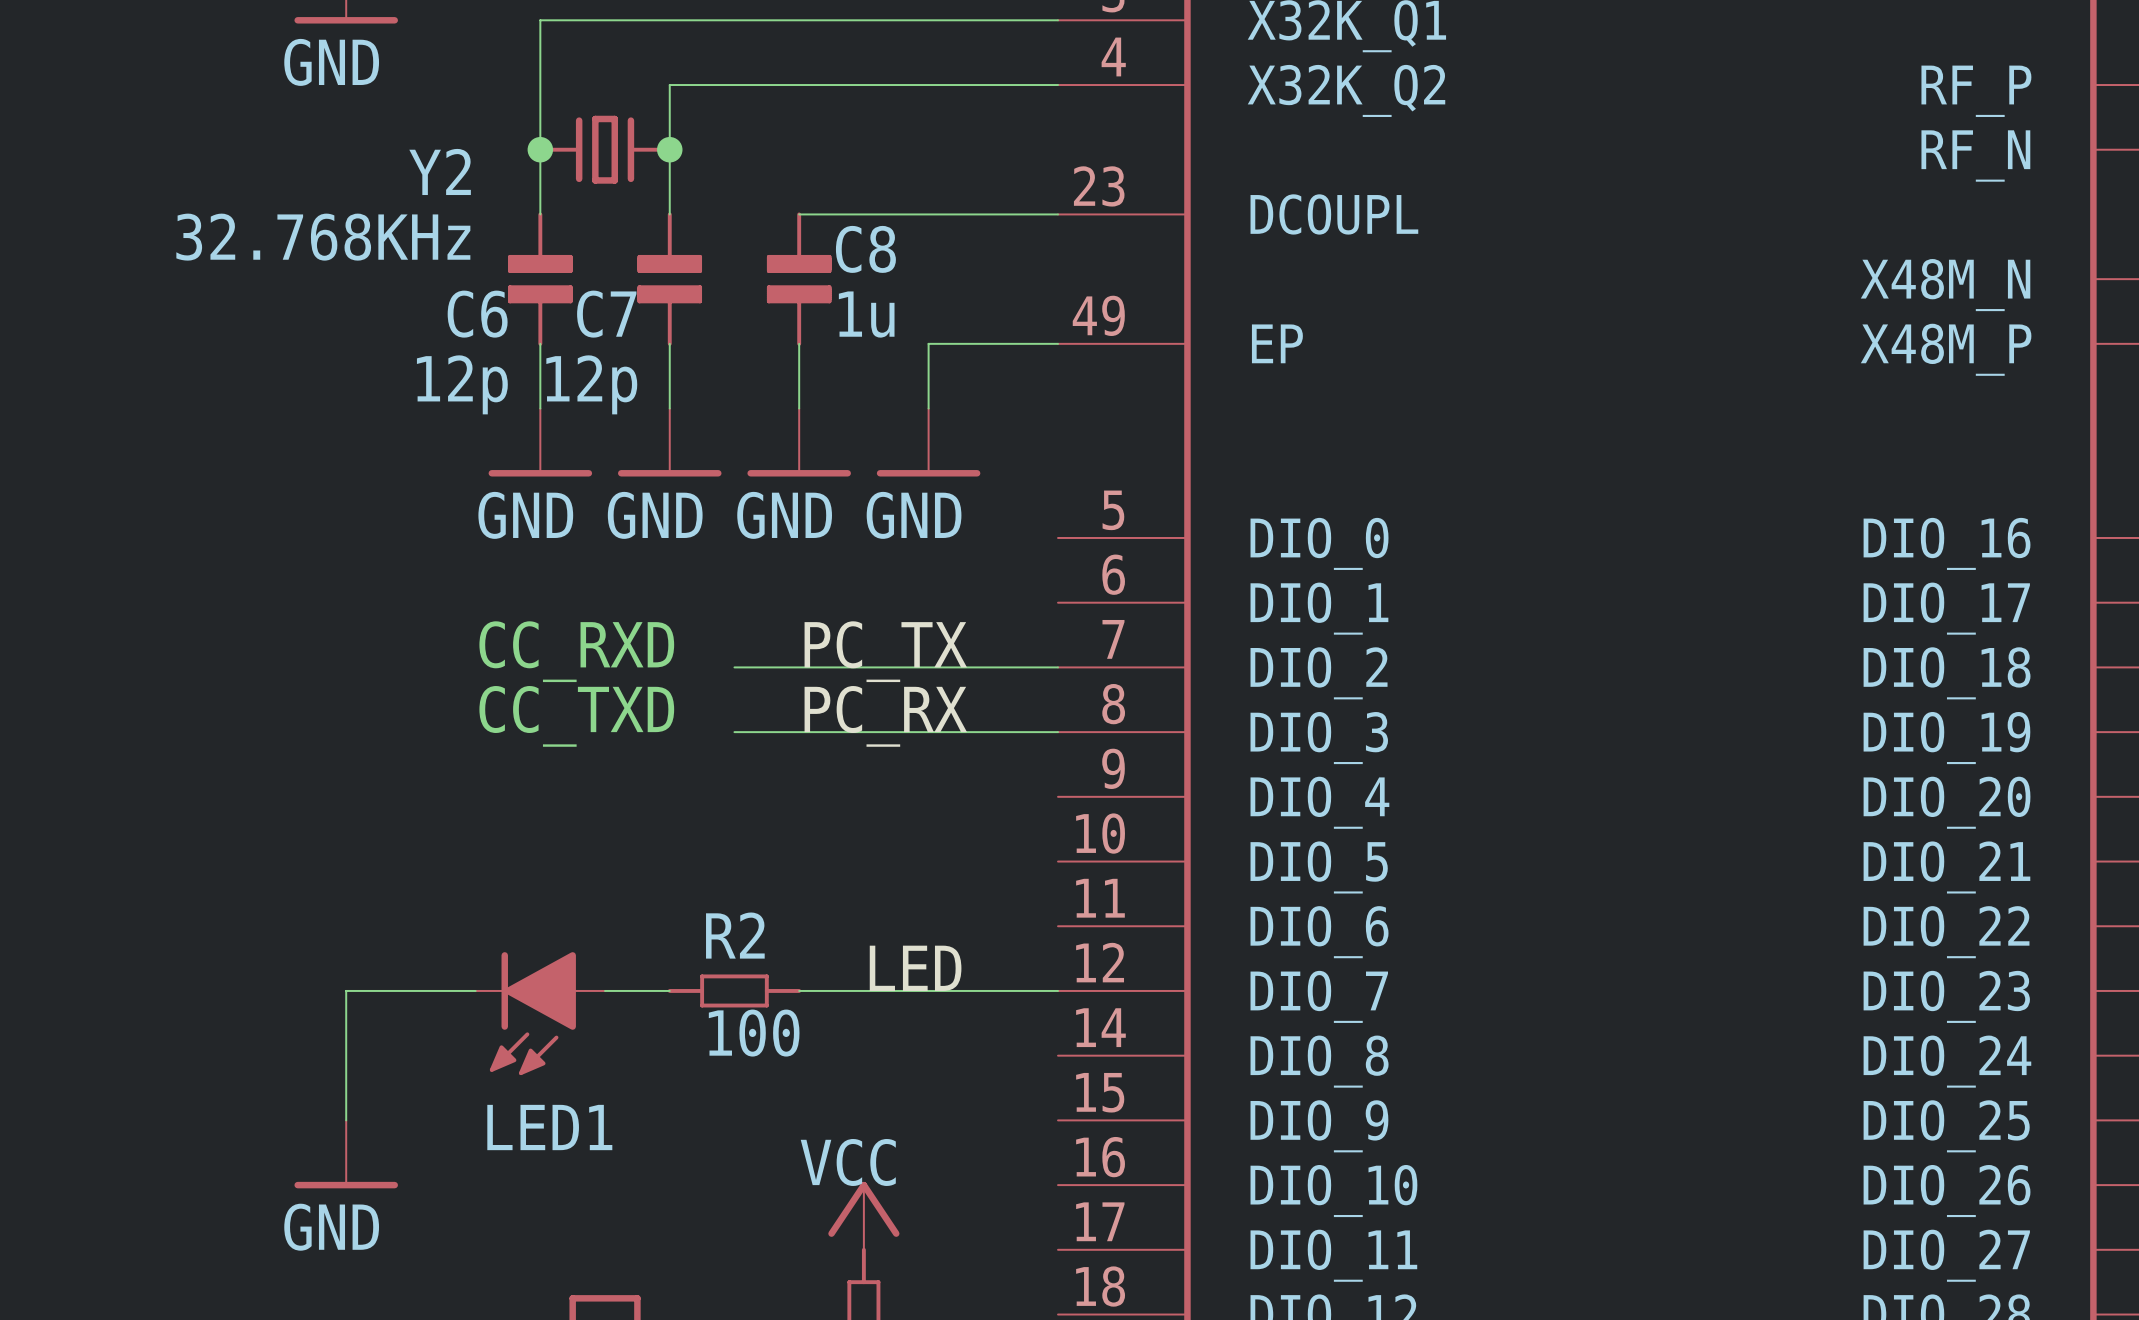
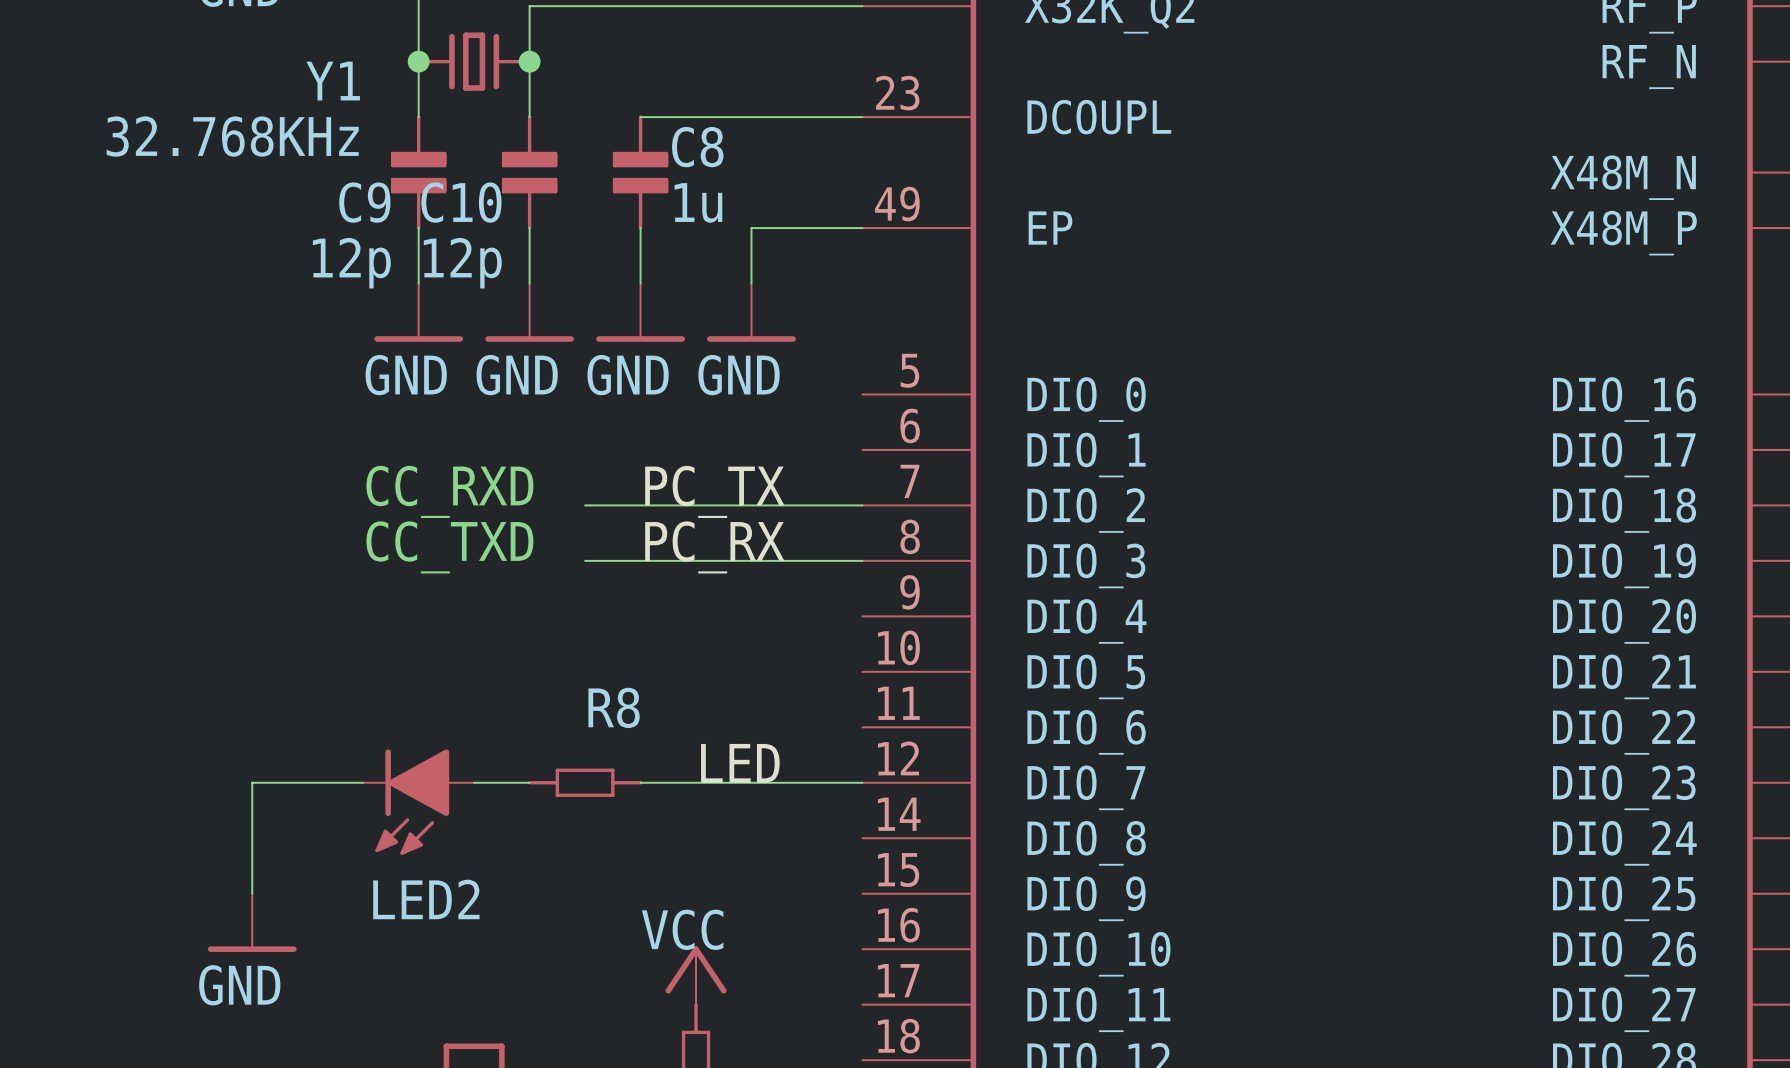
Y2 name: Y2 (440, 171) -> Y1 (333, 81)
C6 name: C6 (477, 314) -> C9 (364, 202)
C7 name: C7 (606, 314) -> C10 (461, 202)
R2 name: R2 (735, 935) -> R8 (614, 707)
R2 value: 100 (754, 1033) -> none
LED1 name: LED1 (549, 1127) -> LED2 (426, 899)

